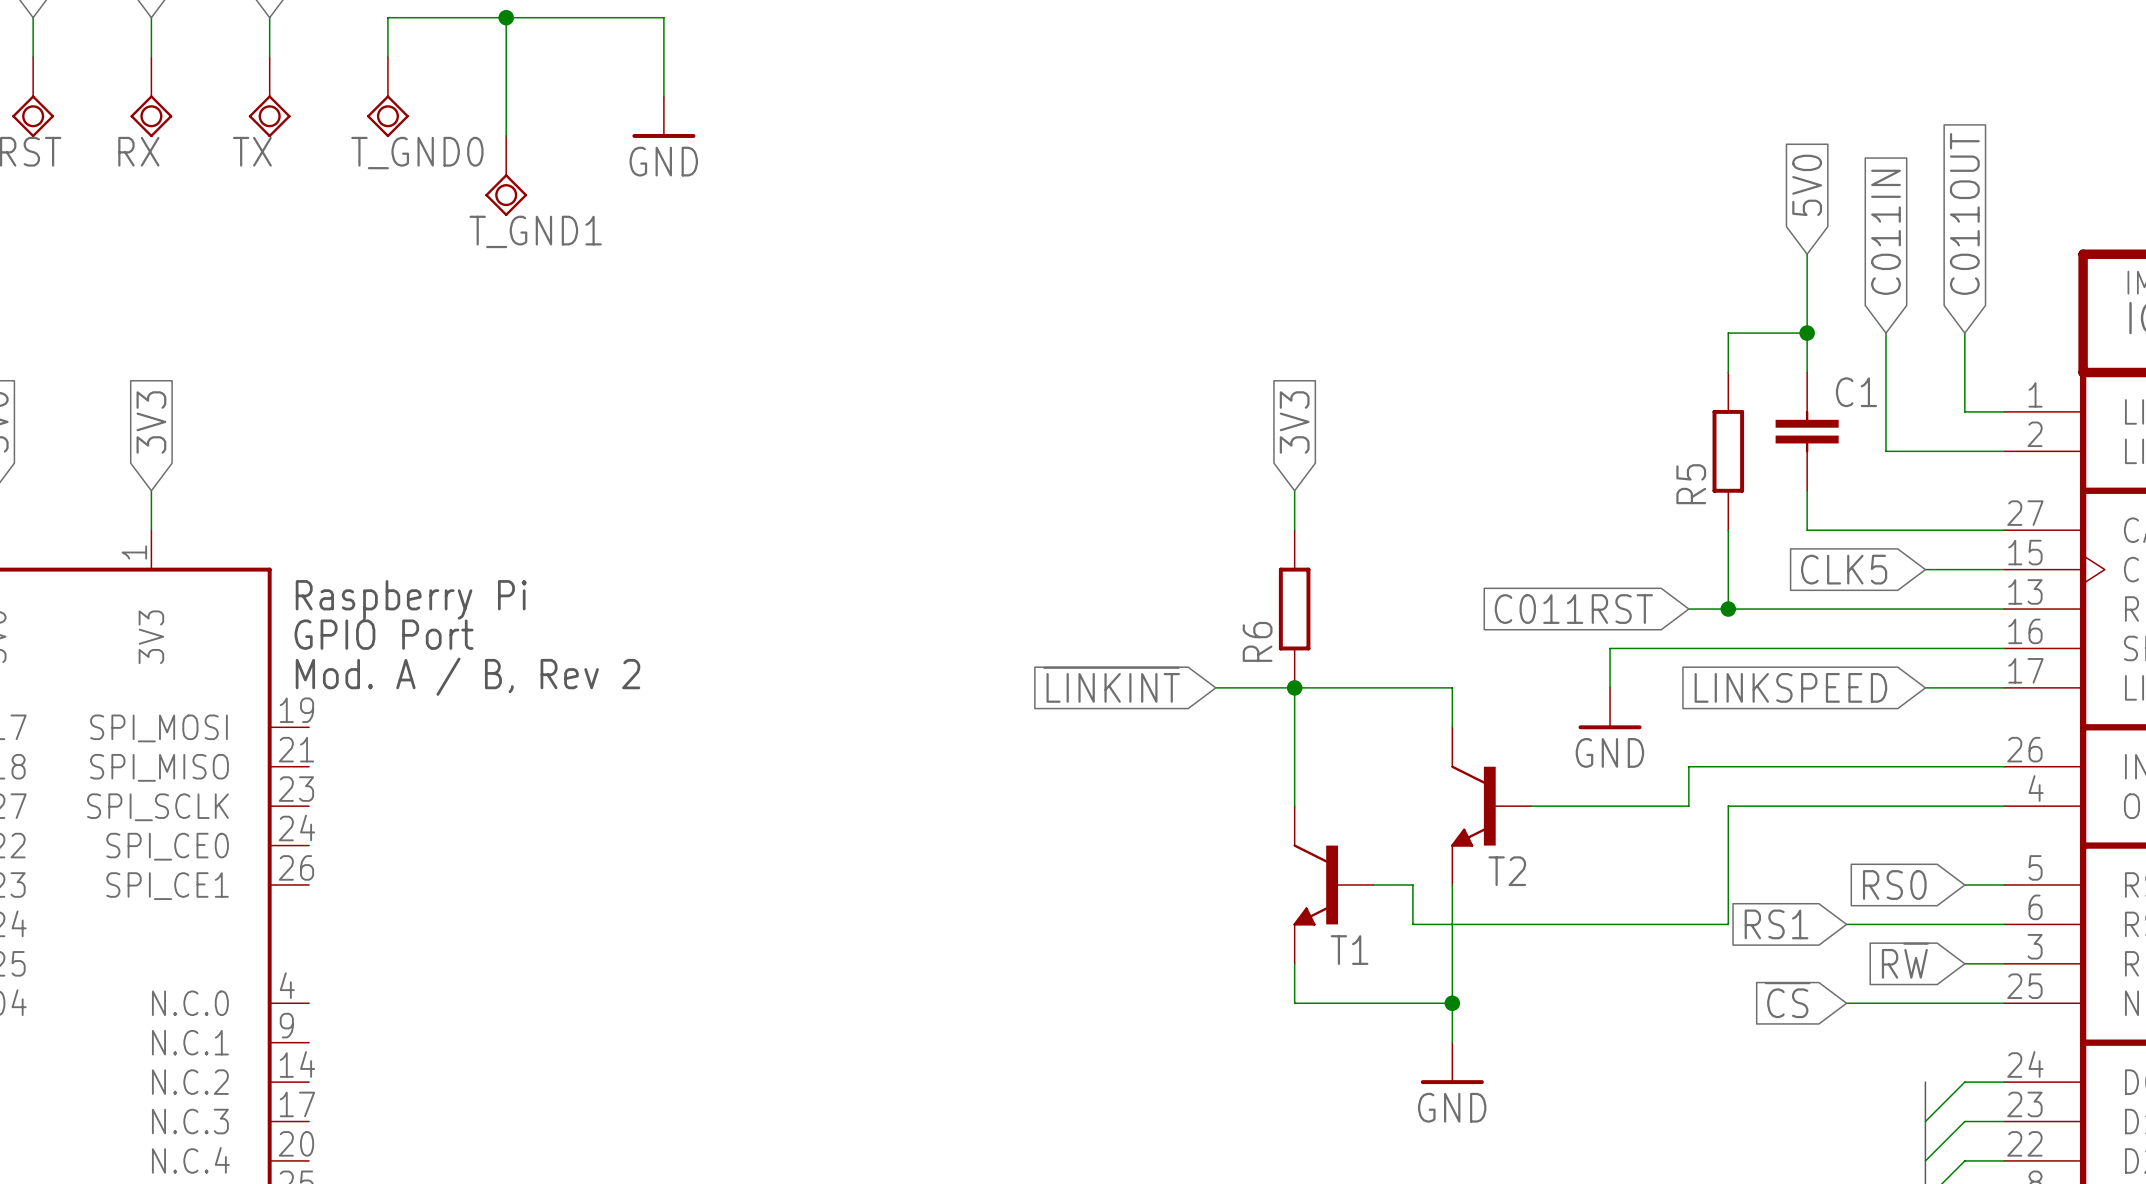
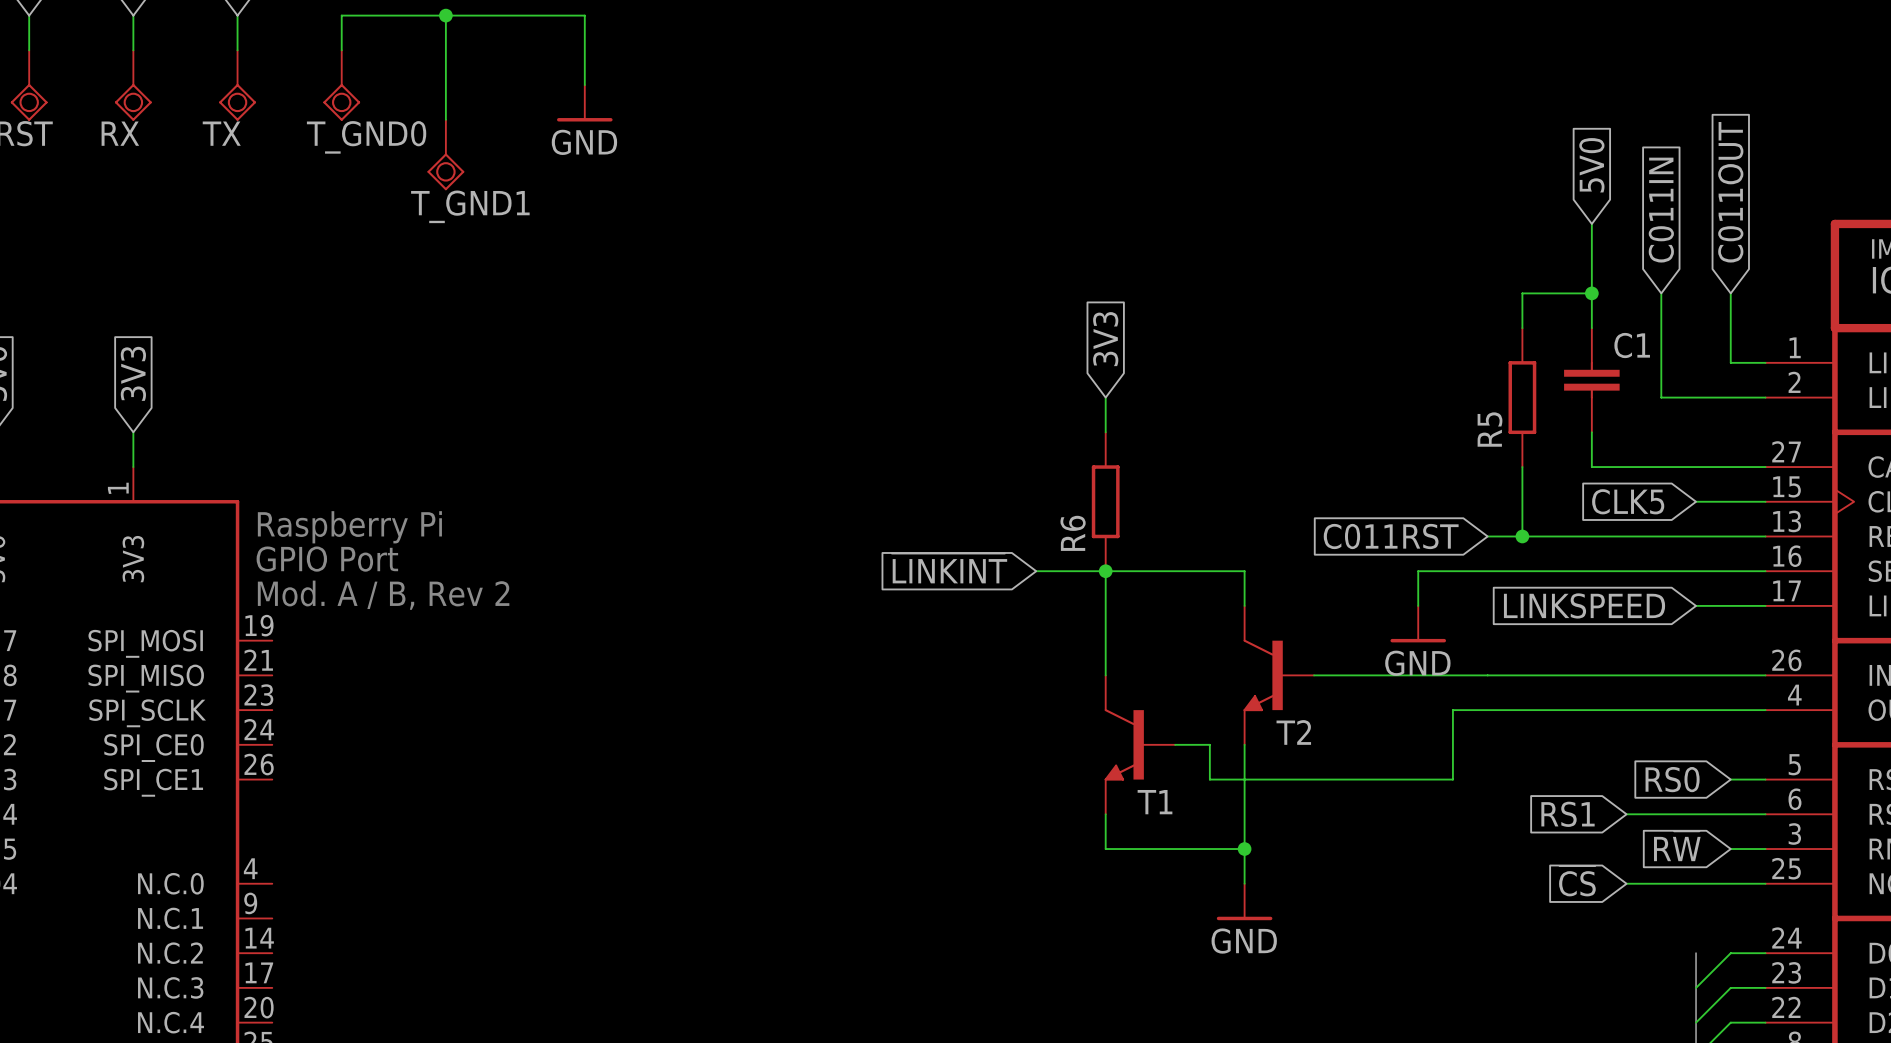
global label position: 3V3 (1294, 422) -> 3V3 (1105, 339)
wire: (1294, 490) (1294, 530) -> (1105, 397) (1105, 432)
R6 position: (1294, 609) -> (1105, 501)
global label position: ~{LINKINT} (1111, 684) -> ~{LINKINT} (949, 568)
wire: (1215, 687) (1452, 687) (1452, 727) -> (1036, 571) (1244, 571) (1244, 605)
wire: (1294, 687) (1294, 806) -> (1105, 571) (1105, 675)
junction position: (1294, 687) -> (1105, 571)
wire: none -> (1314, 675) (1487, 675)
wire: (1688, 766) (1688, 806) -> (1522, 710) (1487, 710)
T2 position: (1491, 806) -> (1278, 675)
wire: (1531, 806) (1649, 806) -> (1244, 744) (1244, 779) (1452, 779) (1452, 710)
wire: (1728, 806) (1728, 924) (1412, 924) -> (1244, 883) (1244, 814)
wire: none -> (1175, 744) (1209, 744) (1209, 779)
T1 position: (1333, 884) -> (1139, 744)
wire: (1452, 884) (1452, 1042) -> none
wire: (1294, 963) (1294, 1003) (1452, 1003) -> (1105, 814) (1105, 849) (1244, 849)
junction position: (1452, 1003) -> (1244, 849)
power symbol position: GND (1452, 1063) -> GND (1244, 901)

